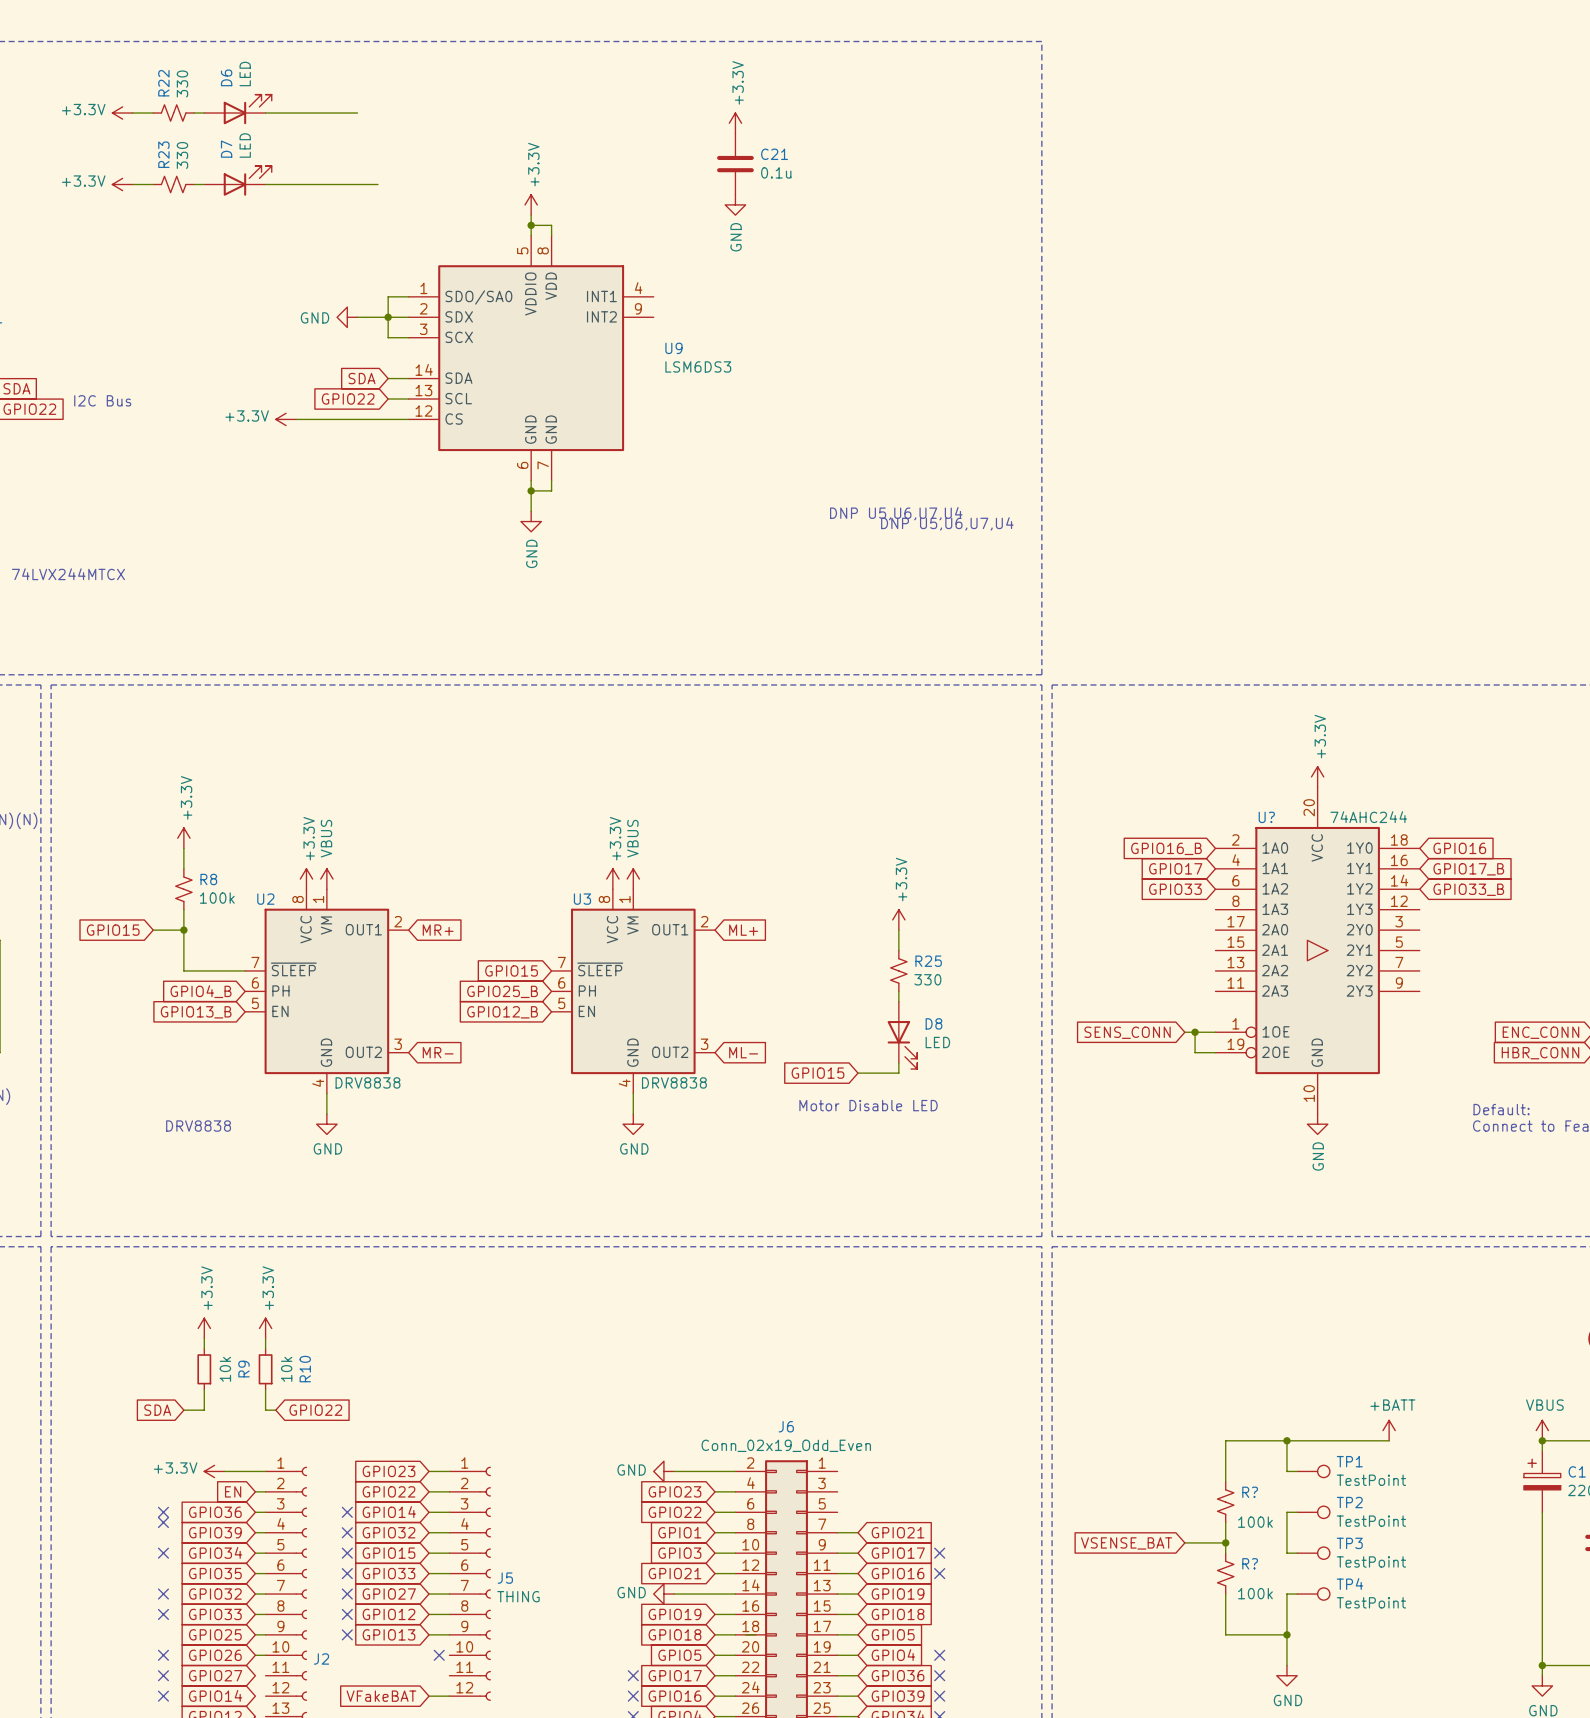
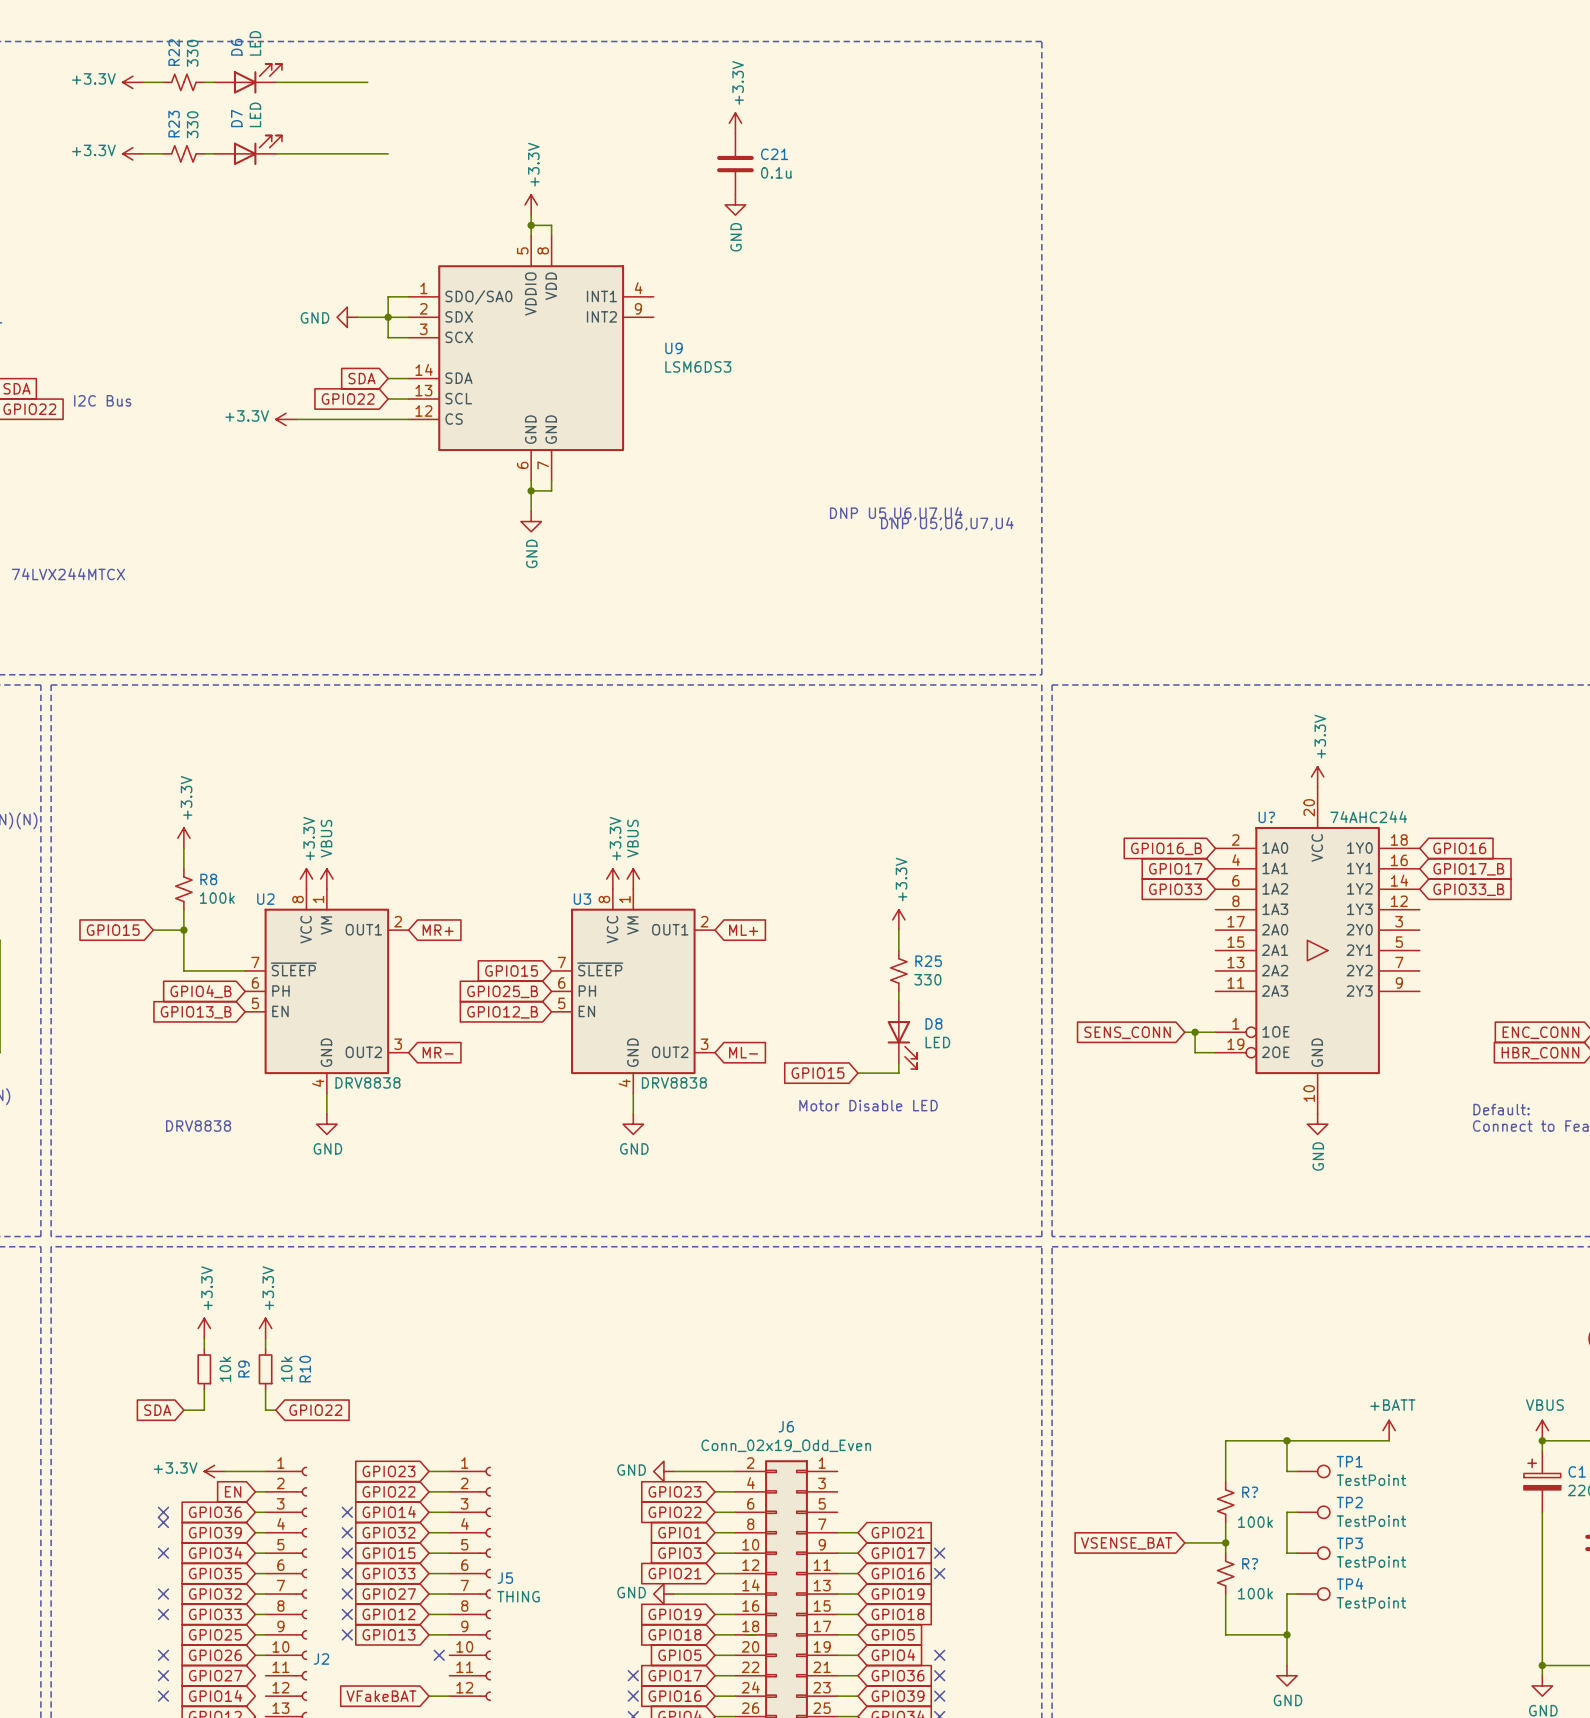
power symbol: none -> +3.3V (132, 82)
D6 position: (238, 109) -> (248, 78)
power symbol: +3.3V (122, 113) -> none
wire: (132, 113) (153, 113) -> (143, 82) (163, 82)
R22 position: (173, 113) -> (183, 82)
wire: (194, 113) (204, 113) -> (204, 82) (214, 82)
wire: (265, 113) (357, 113) -> (275, 82) (367, 82)
power symbol: none -> +3.3V (132, 153)
D7 position: (238, 180) -> (248, 150)
power symbol: +3.3V (122, 184) -> none
wire: (132, 184) (153, 184) -> (143, 153) (163, 153)
R23 position: (173, 184) -> (183, 153)
wire: (194, 184) (204, 184) -> (204, 153) (214, 153)
wire: (265, 184) (377, 184) -> (275, 153) (388, 153)

